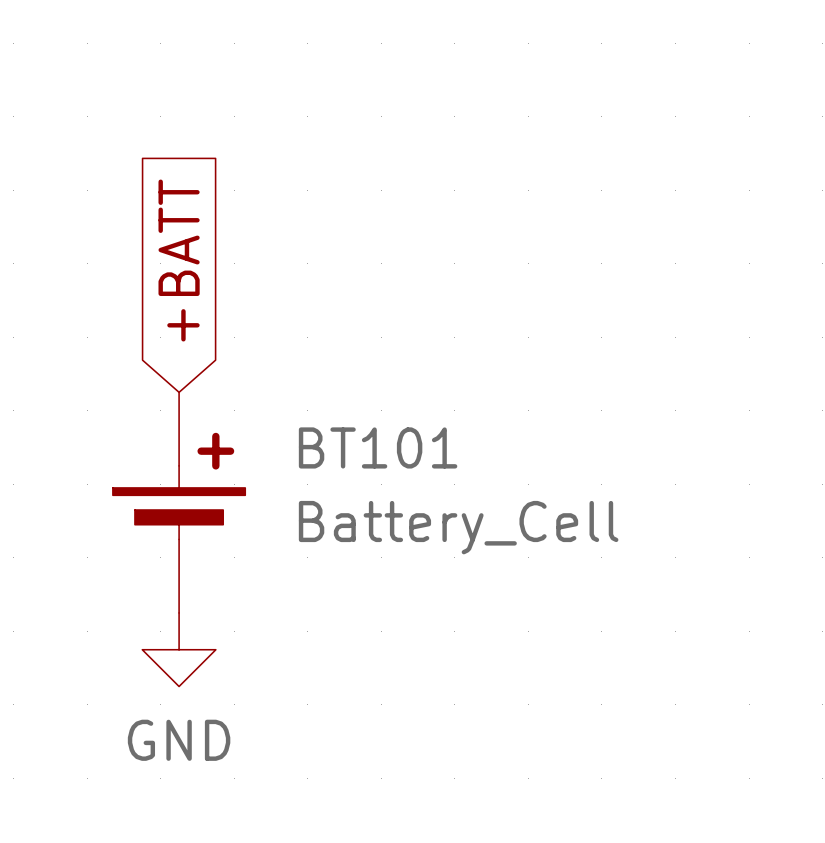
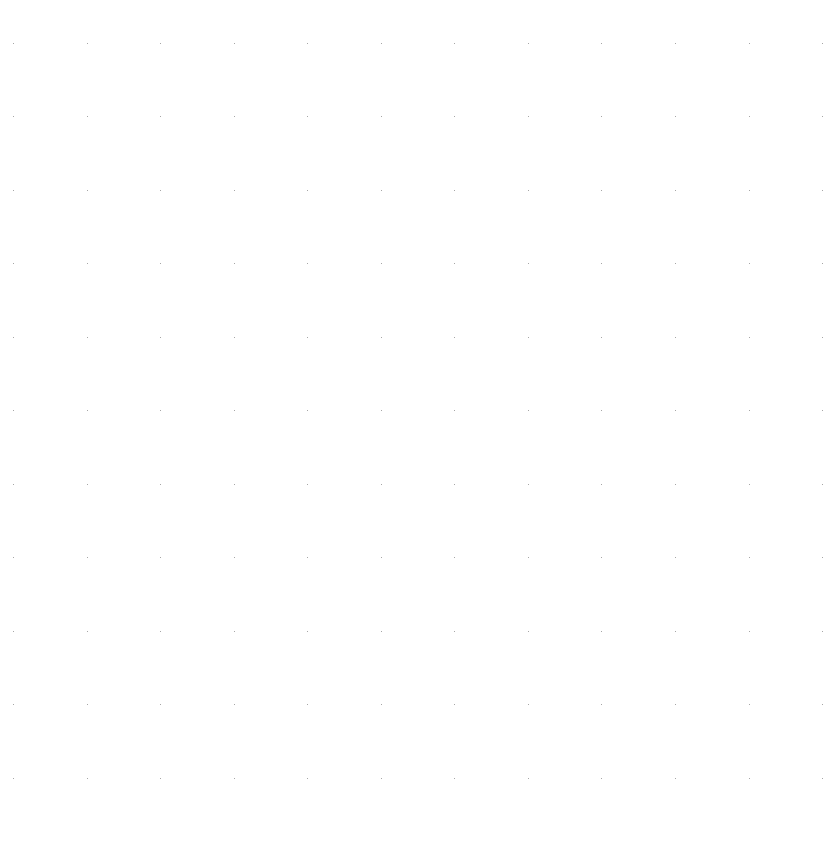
global label: +BATT (179, 260) -> none
BT101: Battery_Cell (179, 502) -> none
power symbol: GND (179, 649) -> none

